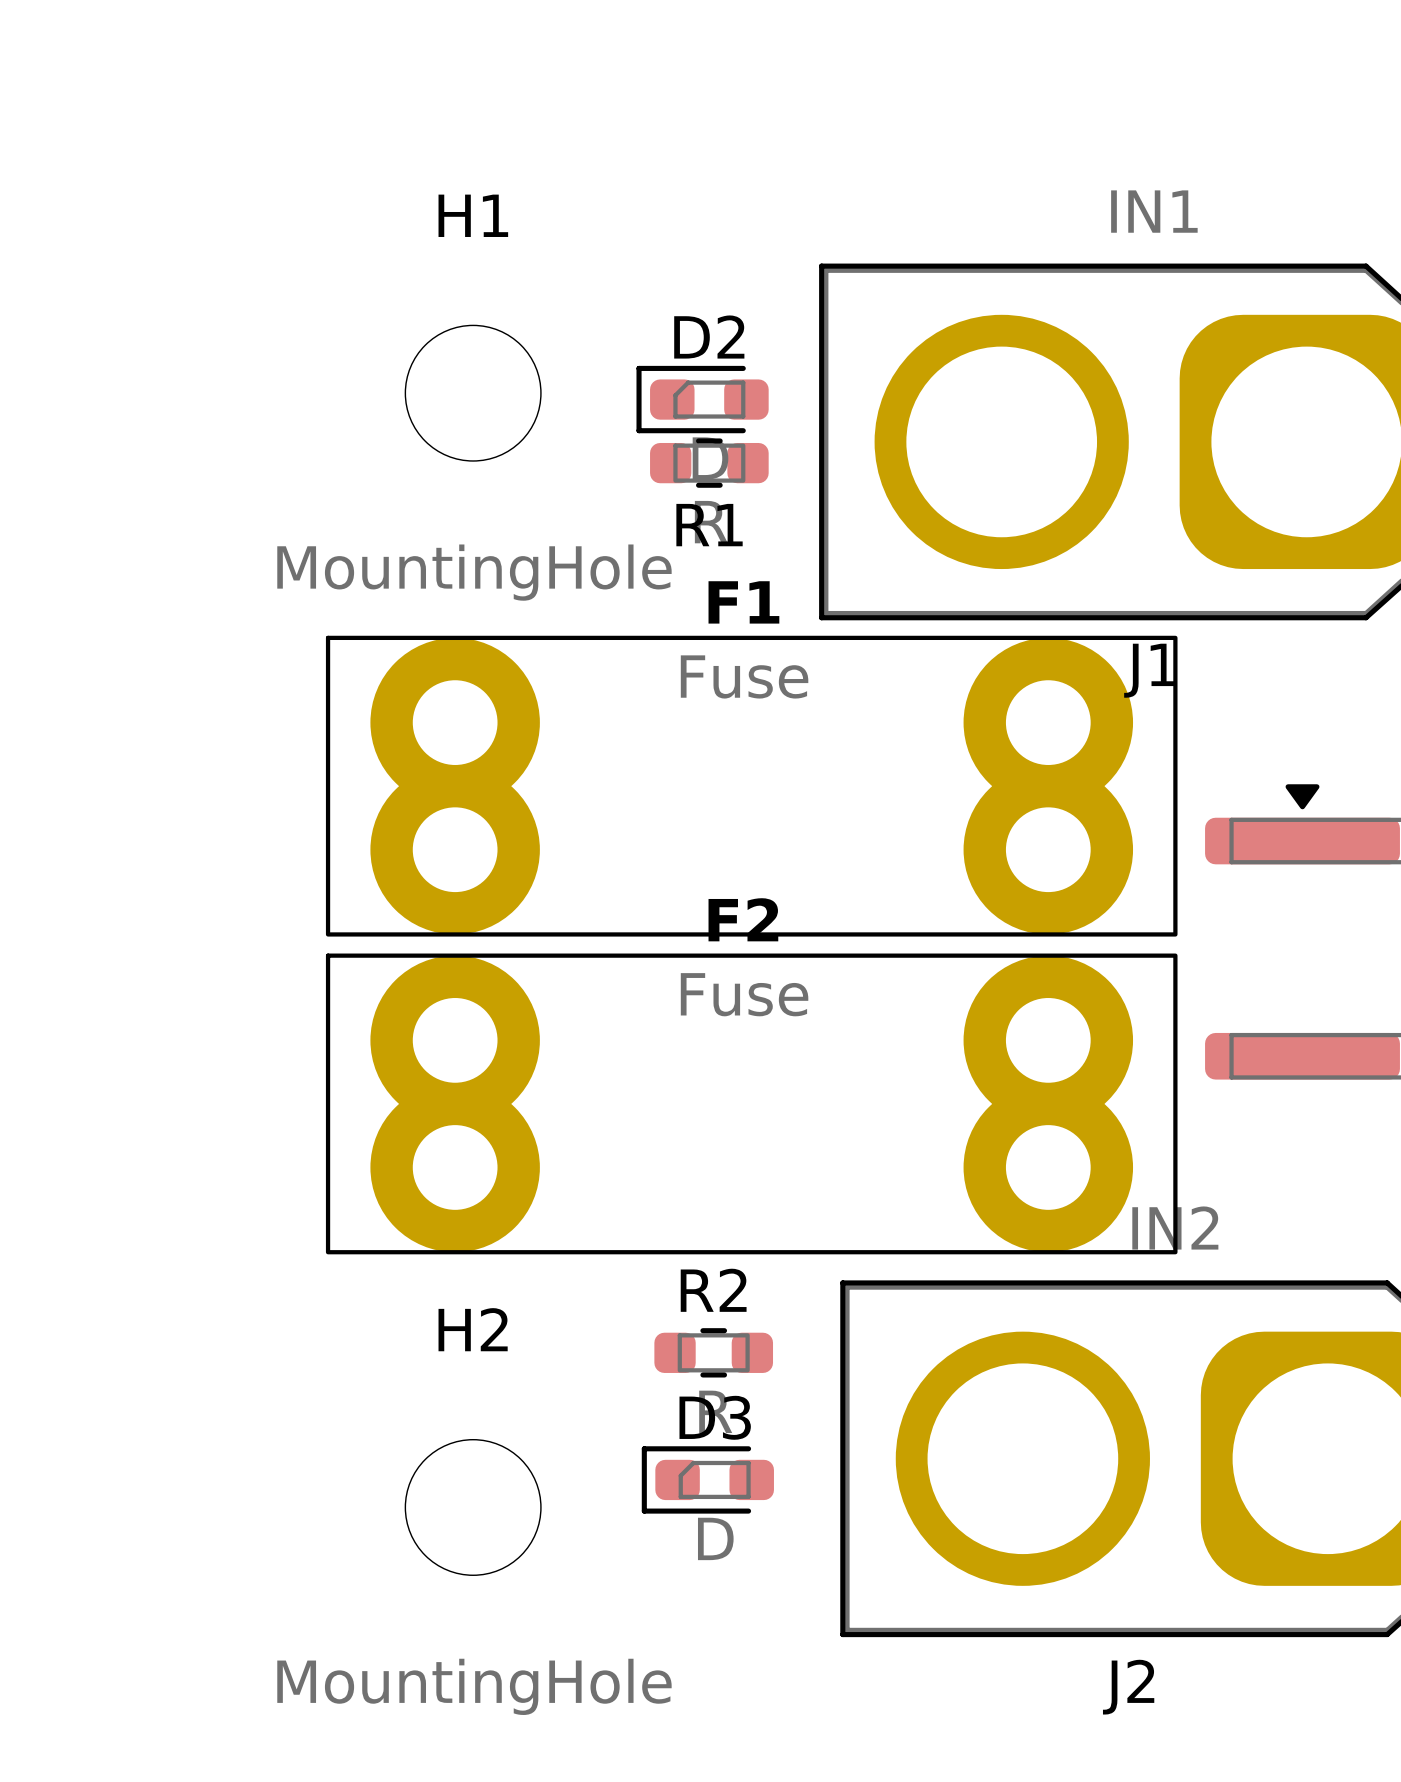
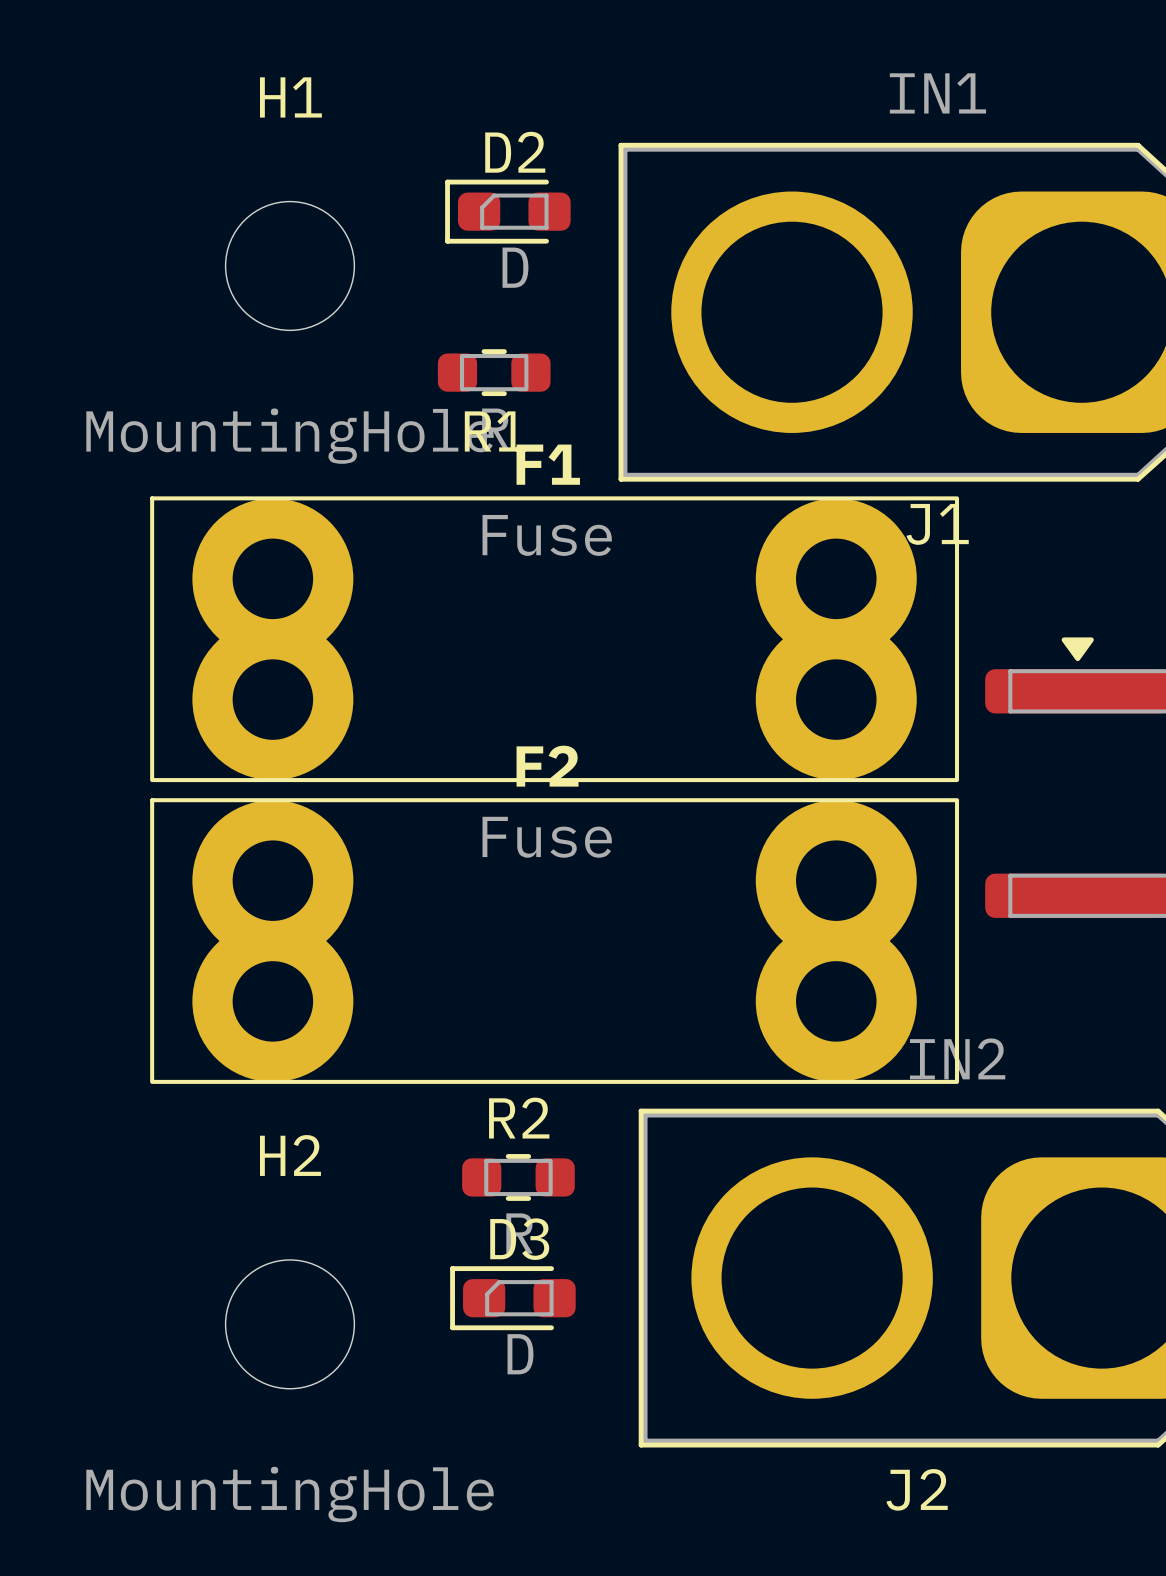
D2 position: (702, 399) -> (507, 211)
R1 position: (709, 463) -> (494, 372)

